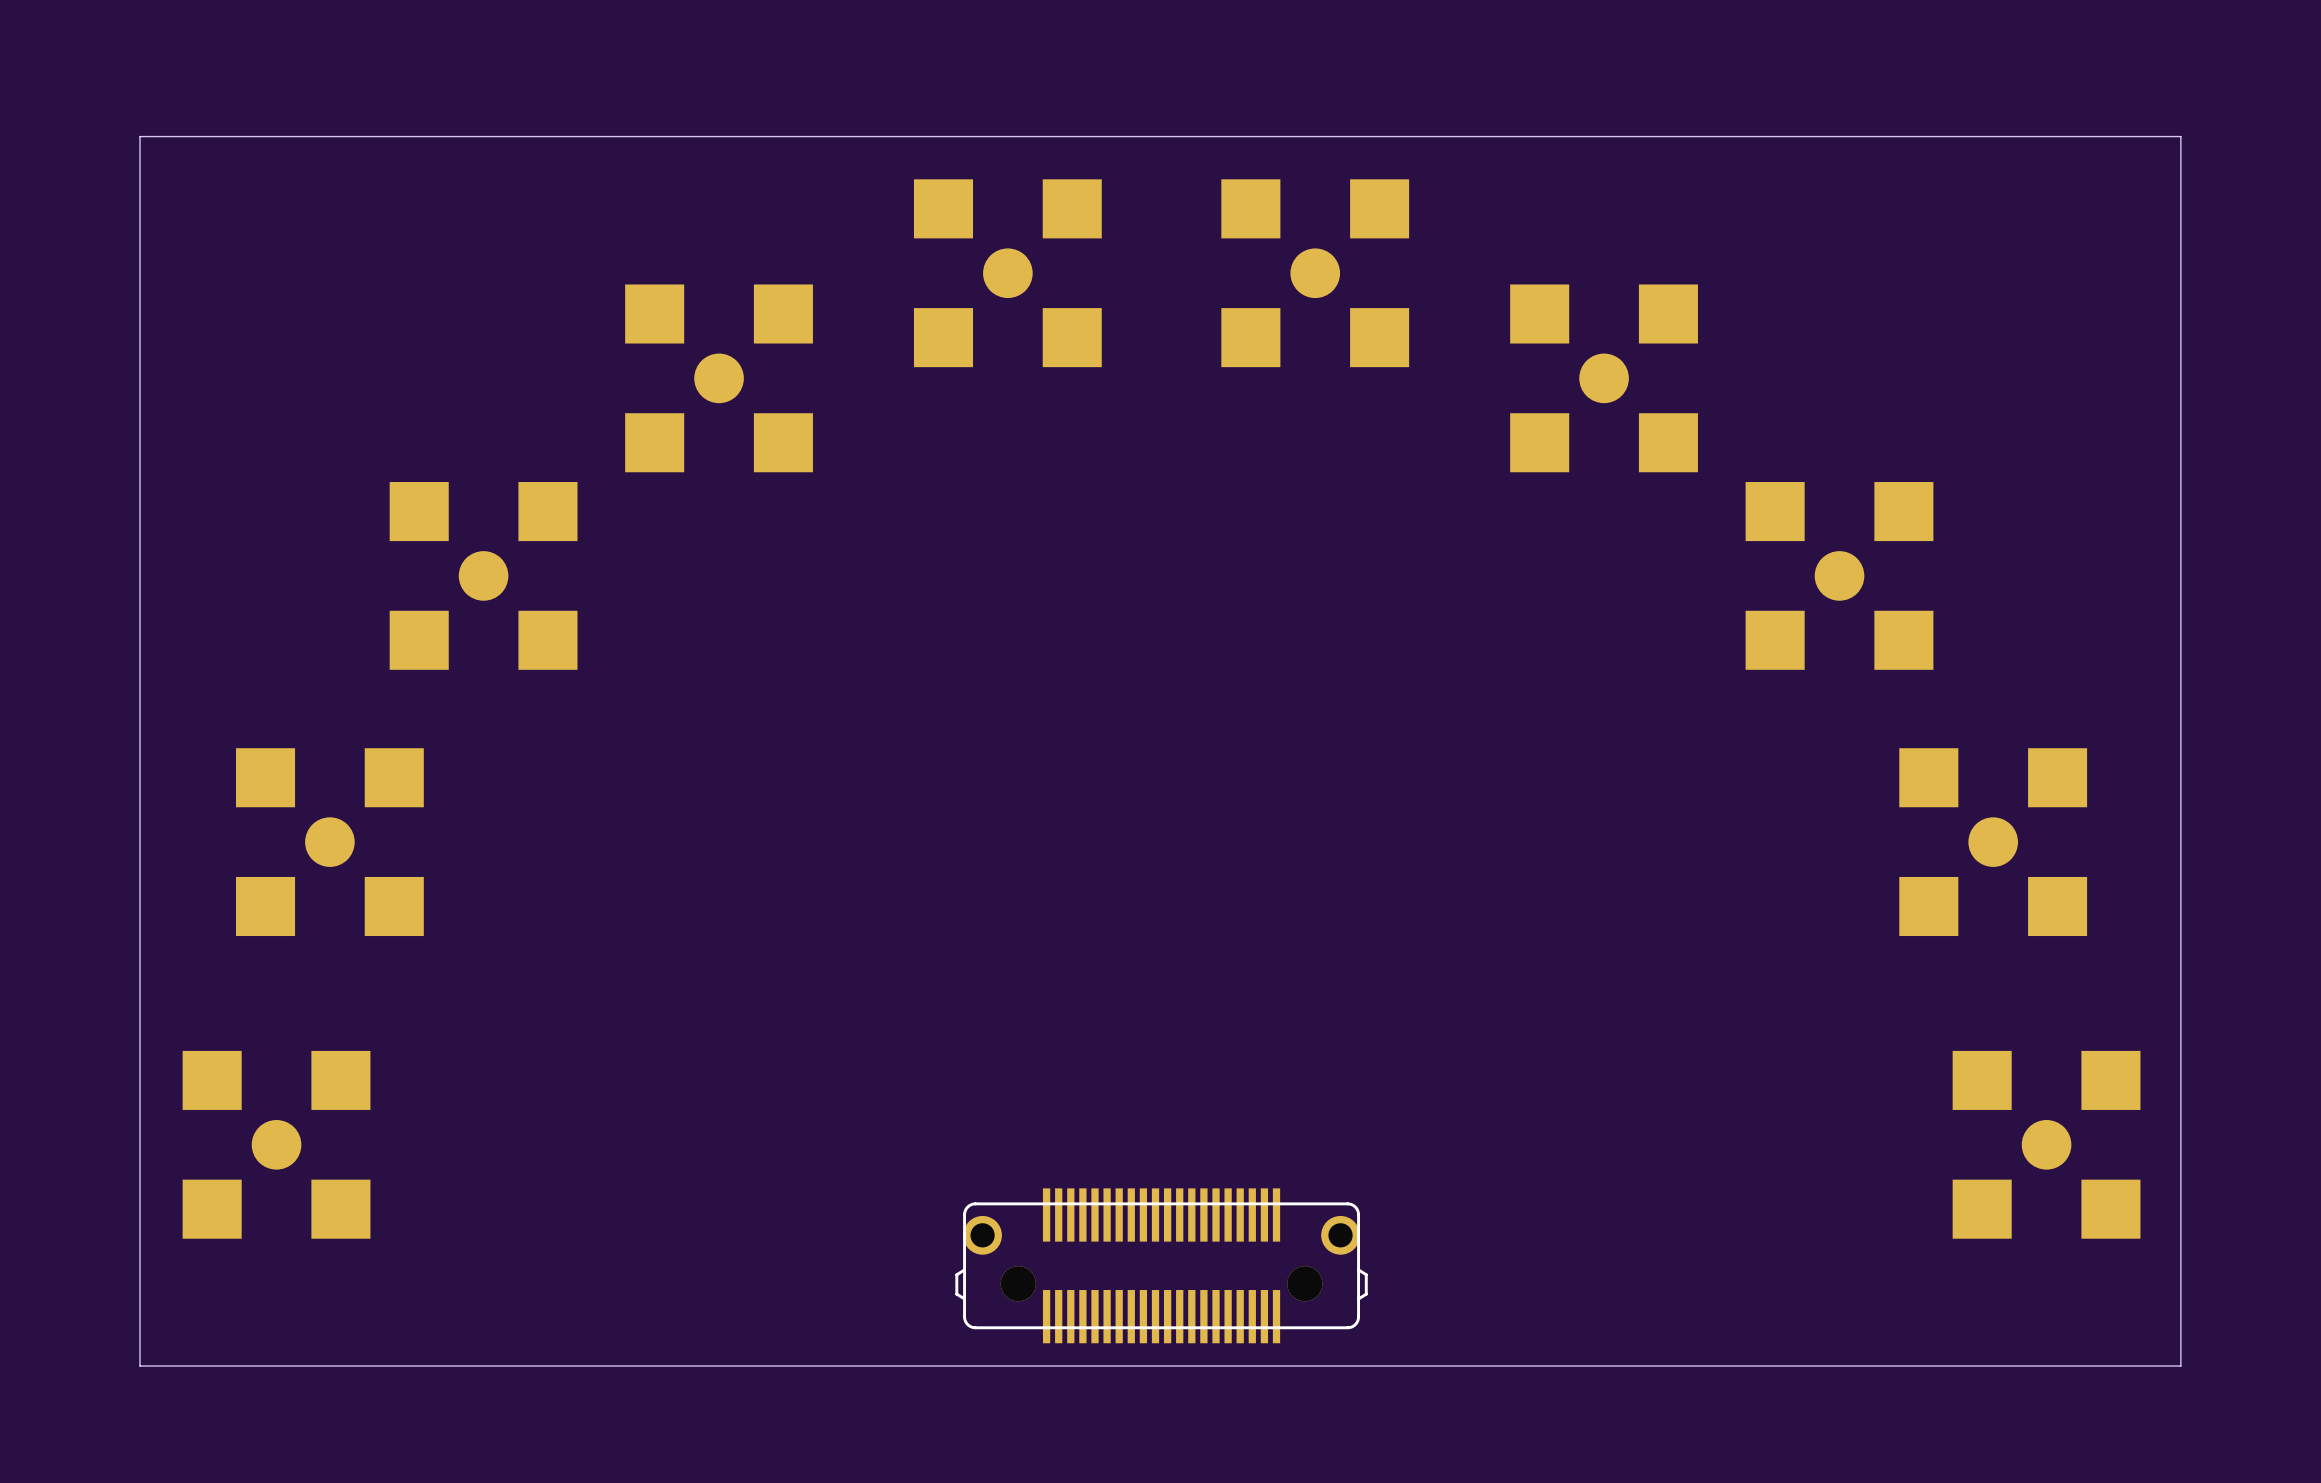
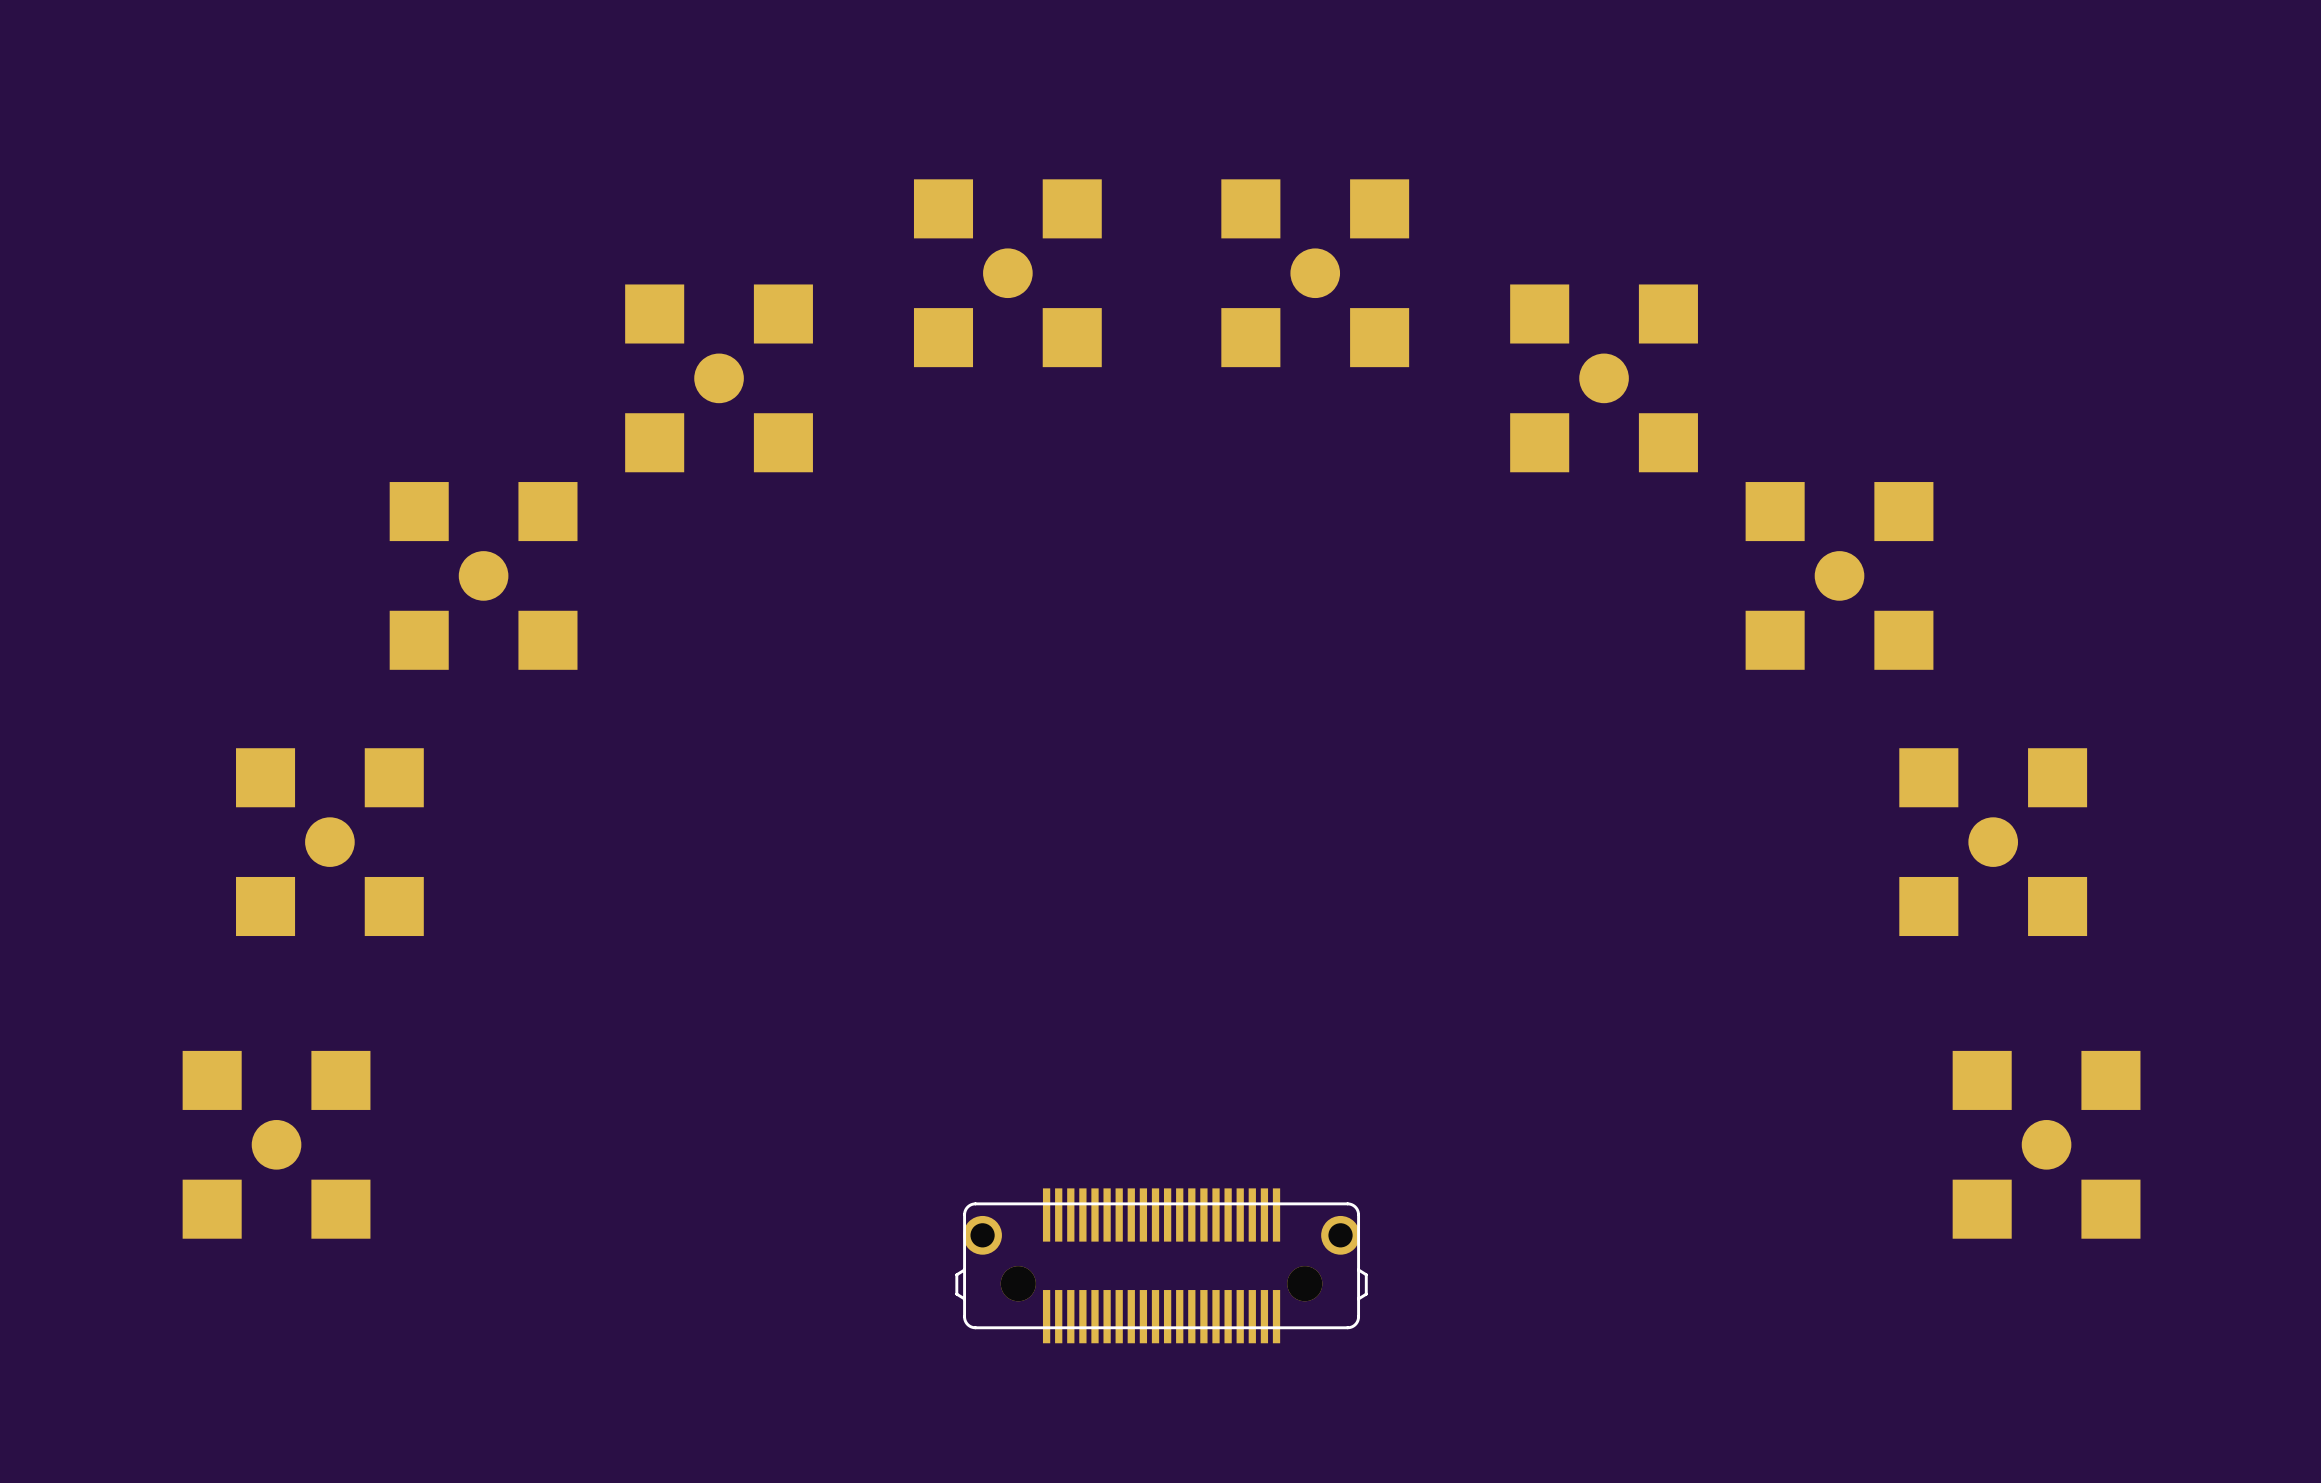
board edge: (140, 136) (2180, 136) (2180, 1366) (140, 1366) (140, 136) -> none

